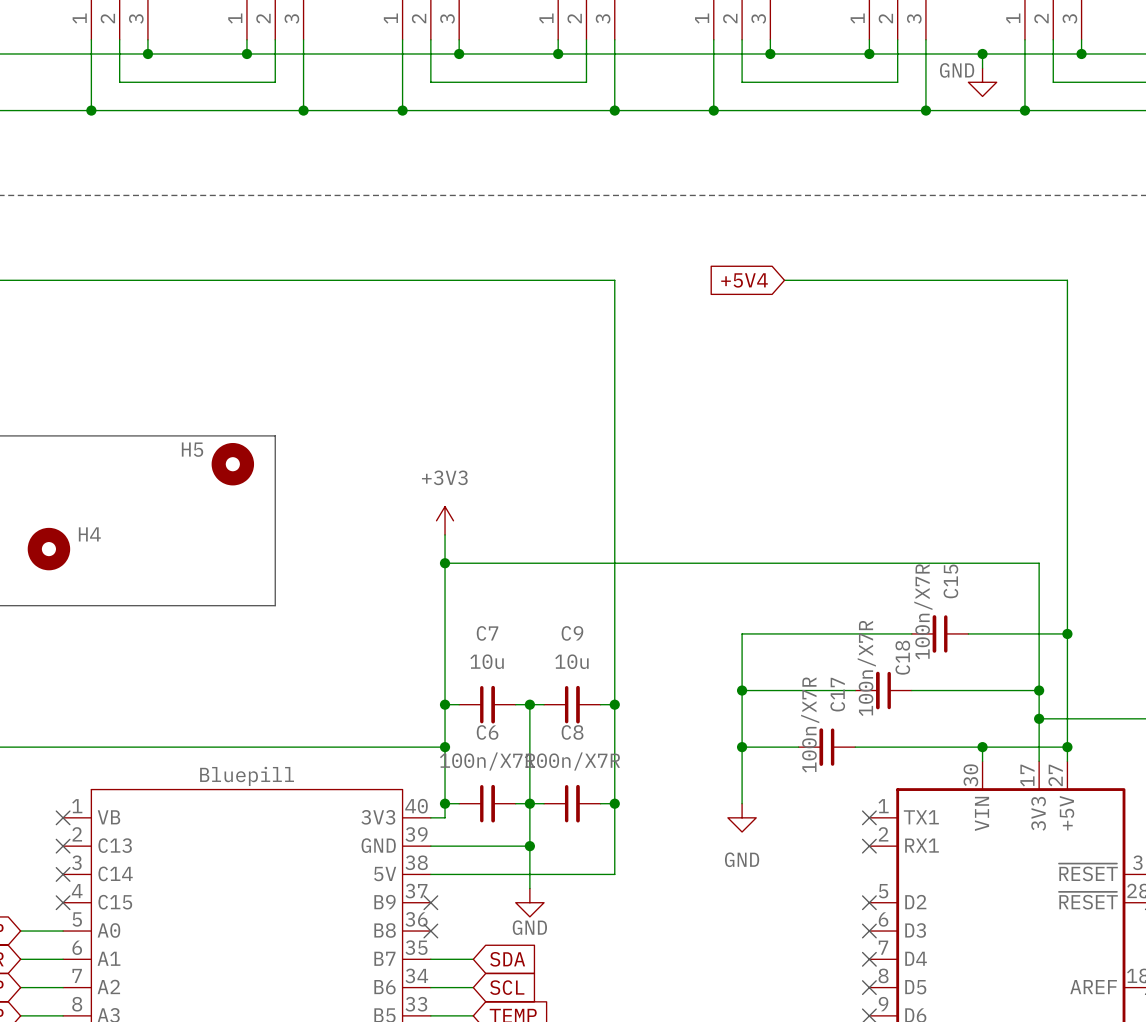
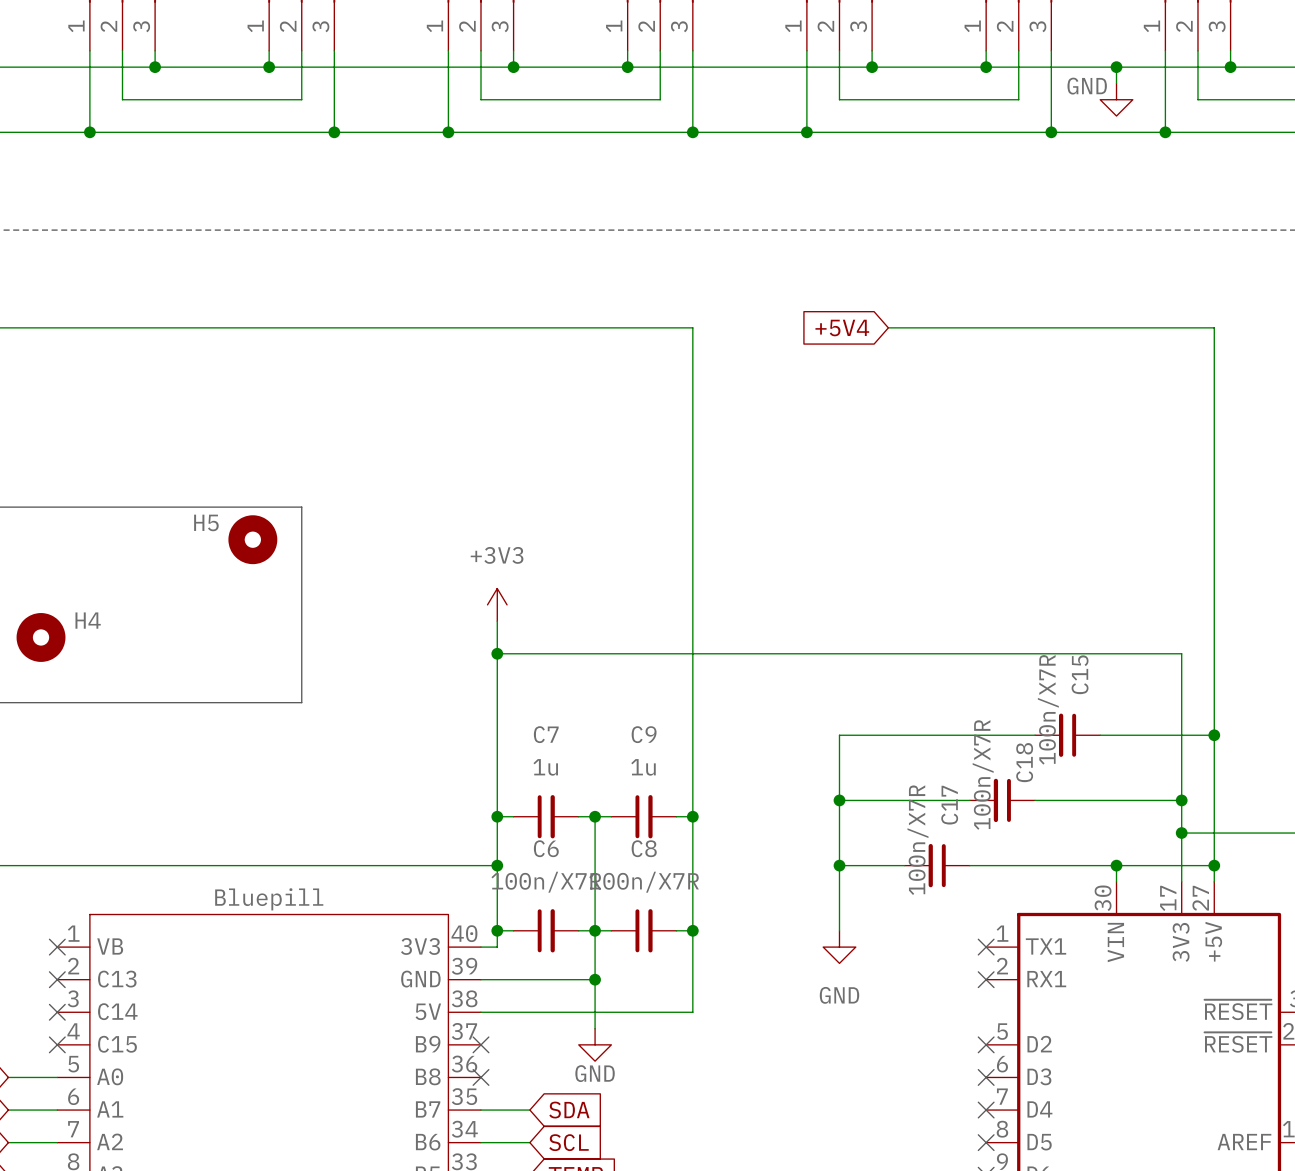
C7 value: 10u (487, 661) -> 1u (545, 767)
C9 value: 10u (571, 661) -> 1u (643, 767)

